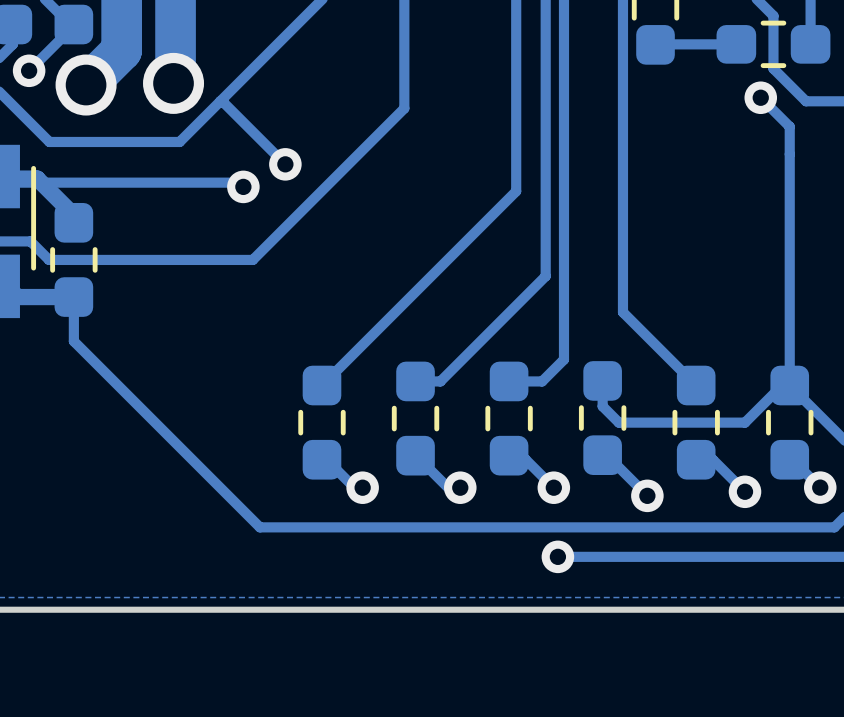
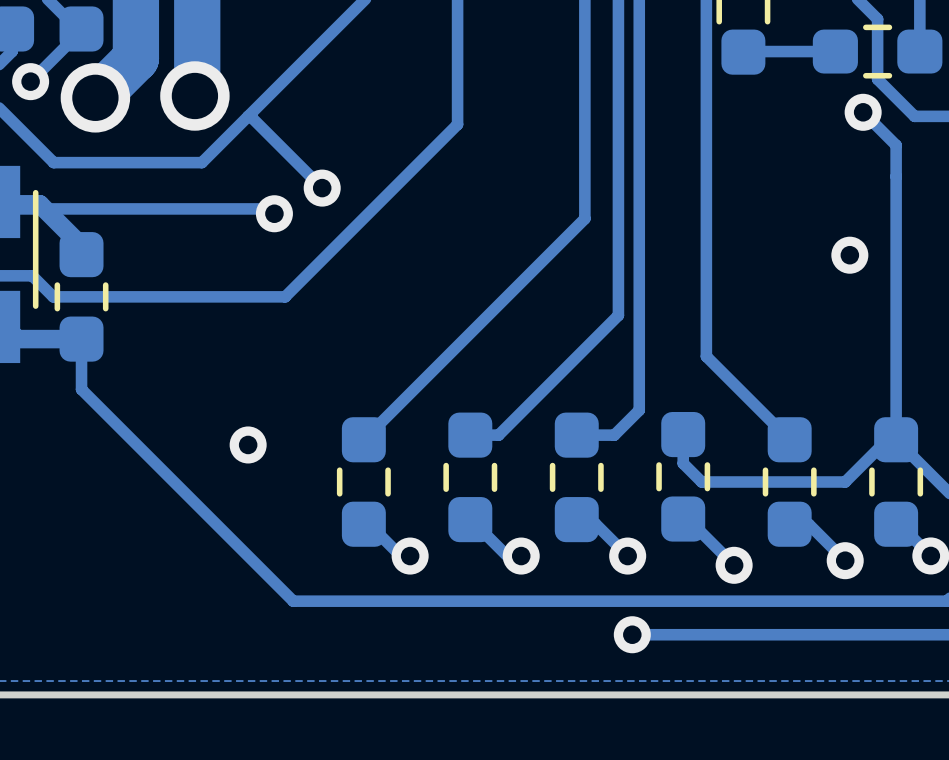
via: none -> (849, 255)
via: none -> (248, 444)

